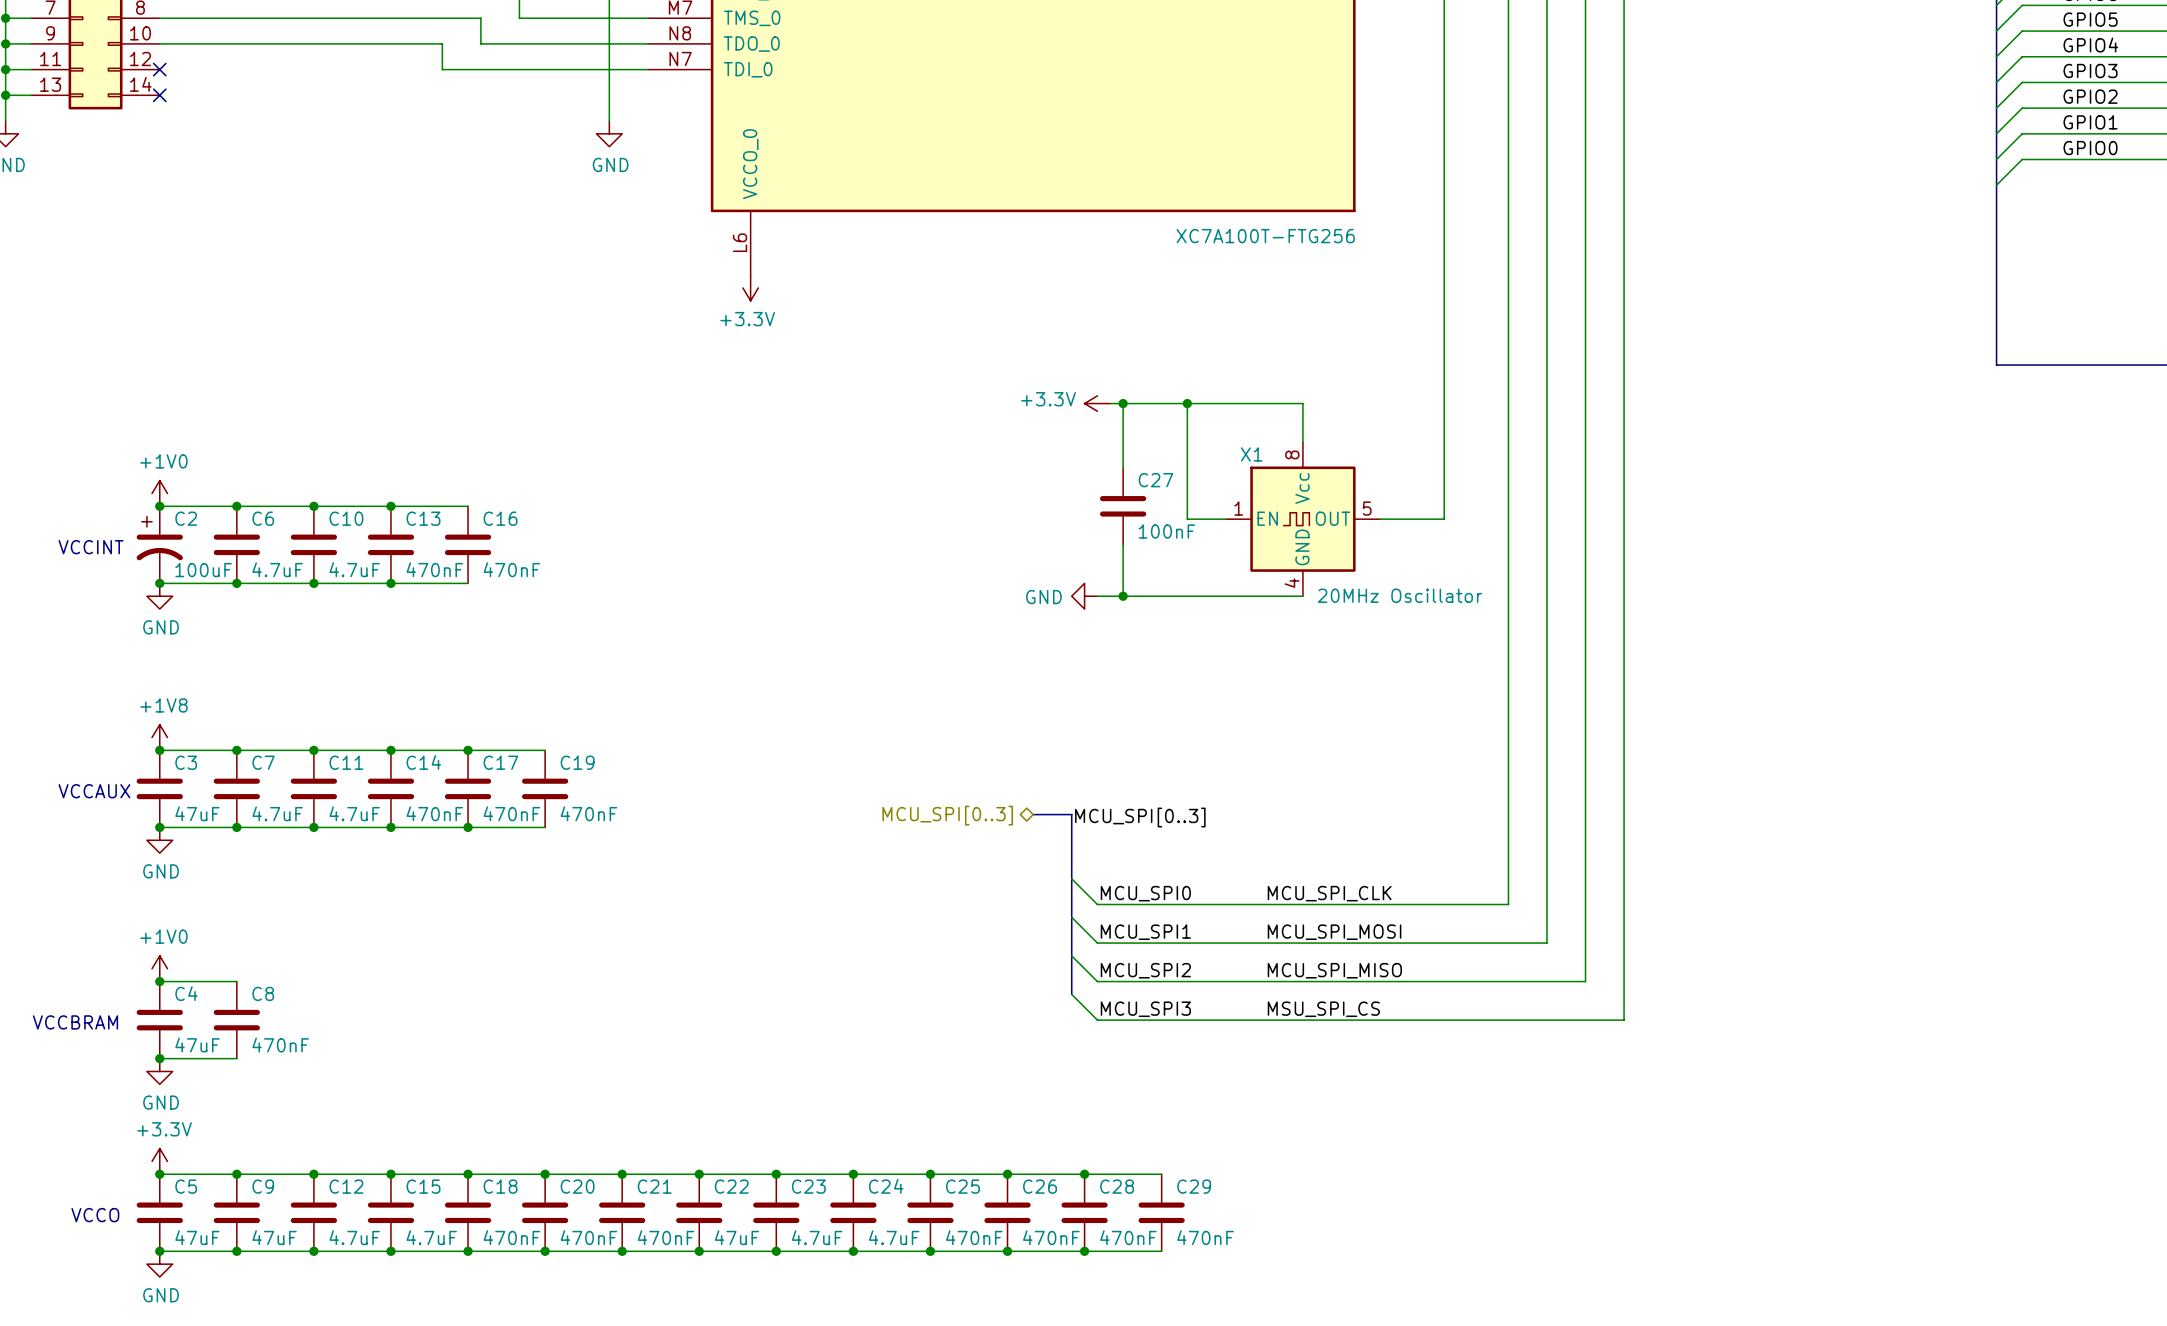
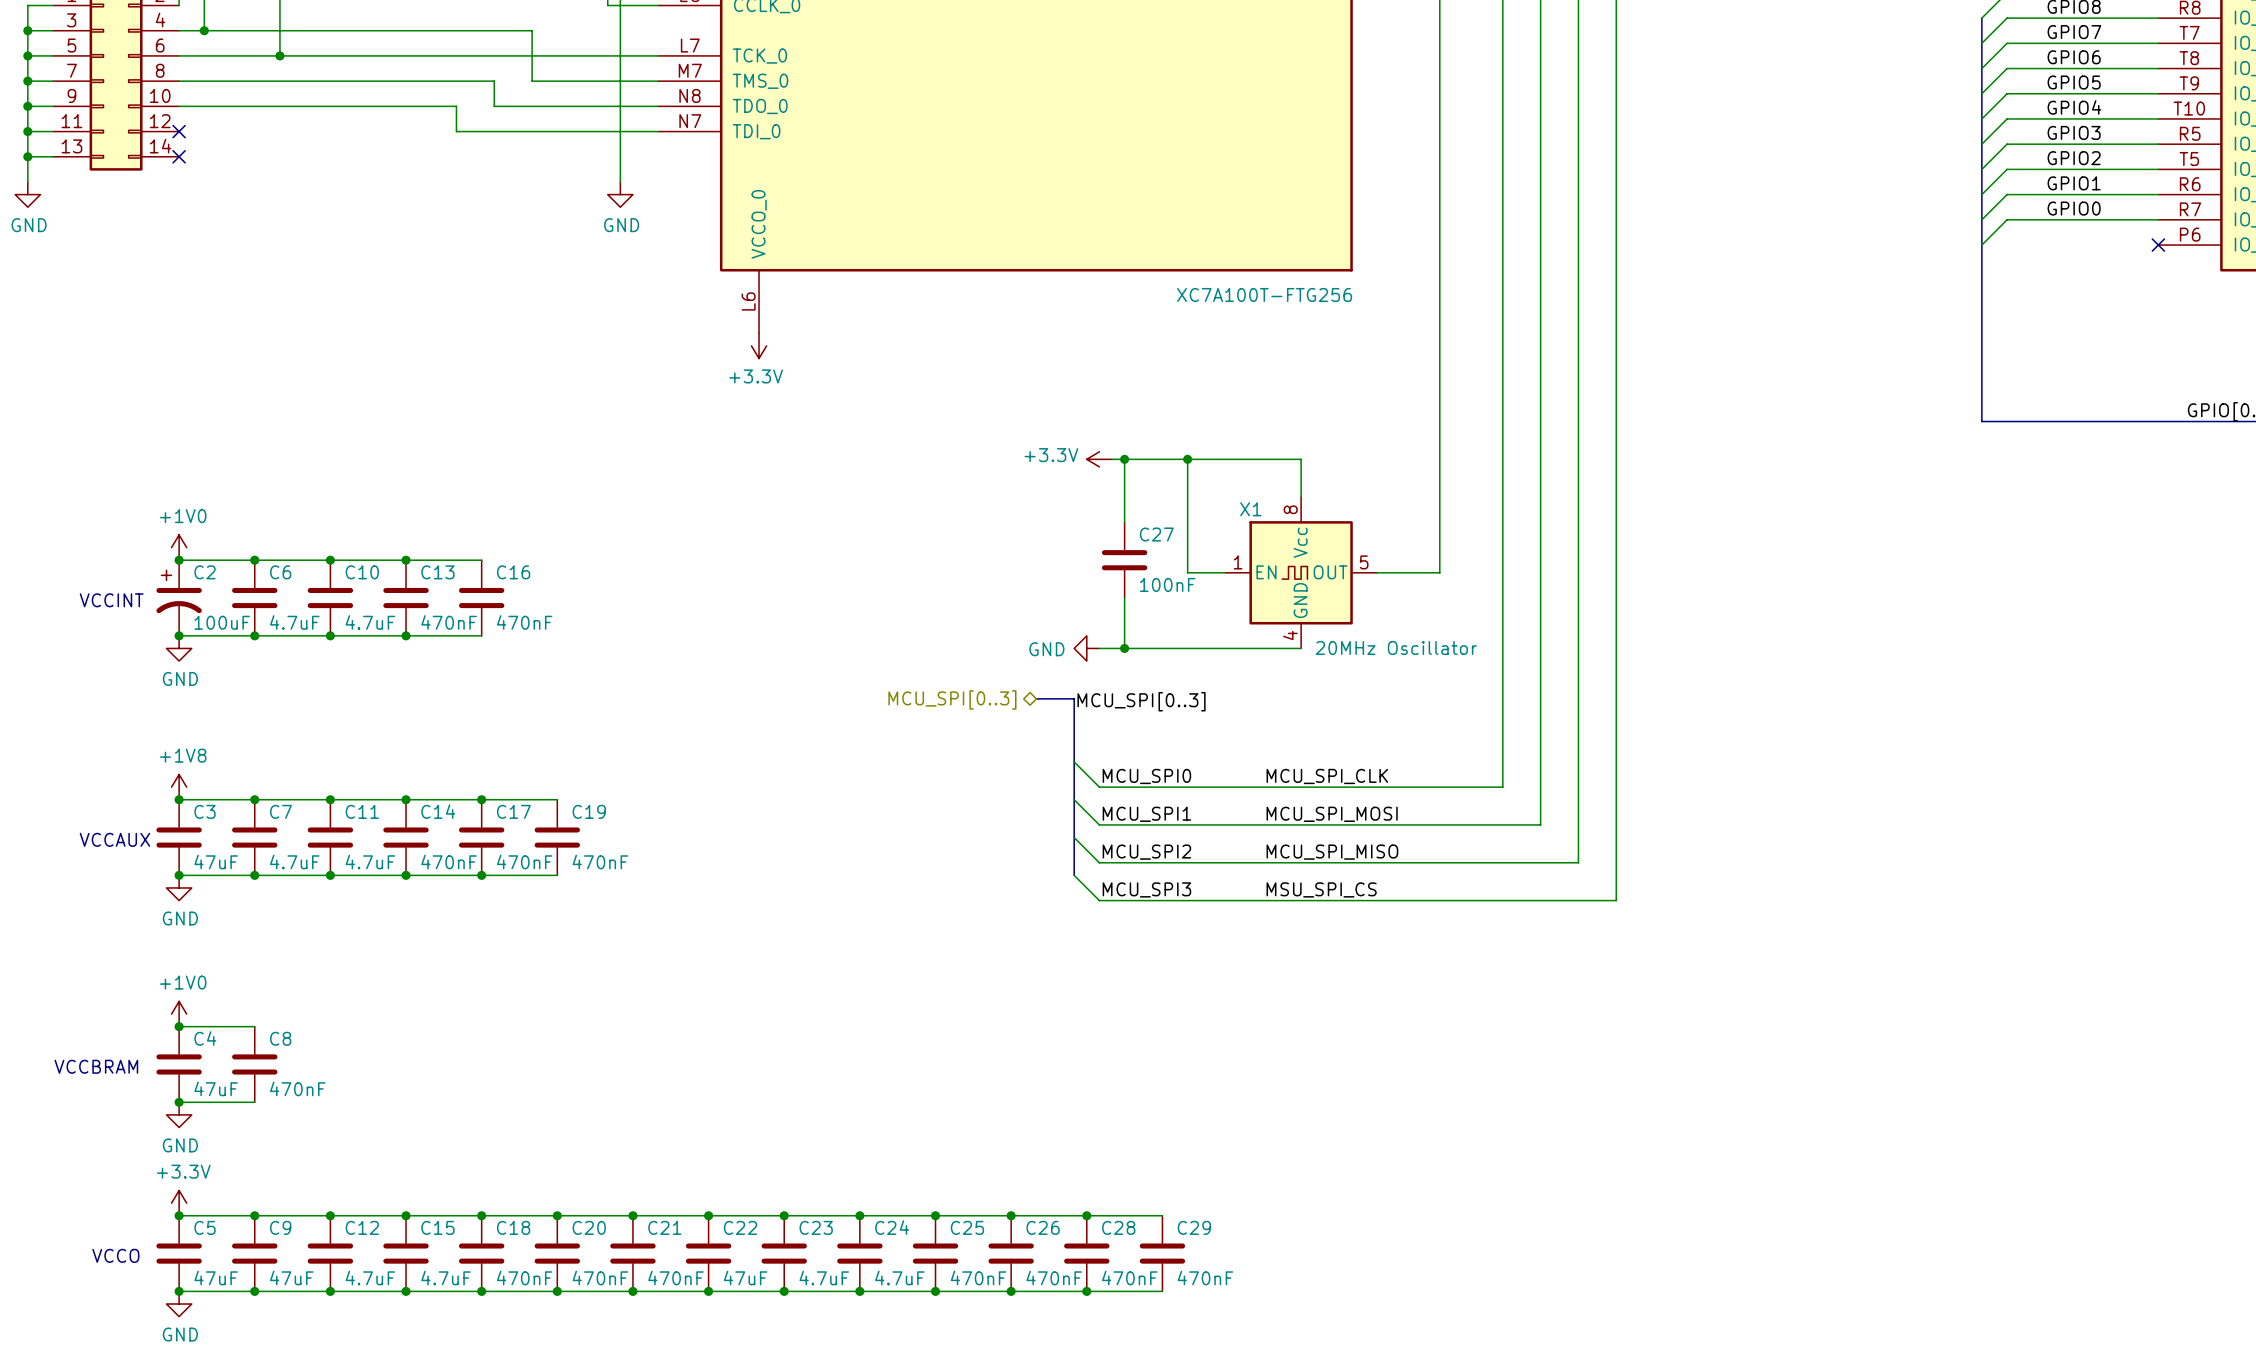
wire: (1508, 737) (1508, 904) (1097, 904) (1071, 878) -> (1502, 787) (1099, 787) (1074, 761)
wire: (1546, 776) (1546, 943) (1097, 943) (1071, 917) -> (1540, 824) (1099, 824) (1074, 799)
bus: (1033, 814) (1071, 814) -> (1036, 698) (1074, 698) (1074, 862)
wire: (1585, 814) (1585, 981) (1097, 981) (1071, 955) -> (1578, 862) (1099, 862) (1074, 837)
hierarchical label position: MCU_SPI[0..3] (947, 815) -> MCU_SPI[0..3] (952, 699)
label position: MCU_SPI[0..3] (1140, 817) -> MCU_SPI[0..3] (1141, 701)
bus: (1071, 827) (1071, 994) -> none
wire: (1624, 853) (1624, 1020) (1097, 1020) (1071, 994) -> (1616, 900) (1099, 900) (1074, 875)
label position: MCU_SPI0 (1145, 893) -> MCU_SPI0 (1146, 776)
label position: MCU_SPI_CLK (1329, 893) -> MCU_SPI_CLK (1327, 776)
label position: MCU_SPI1 (1145, 932) -> MCU_SPI1 (1146, 814)
label position: MCU_SPI_MOSI (1334, 932) -> MCU_SPI_MOSI (1332, 814)
label position: MCU_SPI2 (1145, 970) -> MCU_SPI2 (1146, 852)
label position: MCU_SPI_MISO (1334, 970) -> MCU_SPI_MISO (1332, 852)
label position: MCU_SPI3 (1145, 1009) -> MCU_SPI3 (1146, 889)
label position: MSU_SPI_CS (1323, 1009) -> MSU_SPI_CS (1321, 889)

